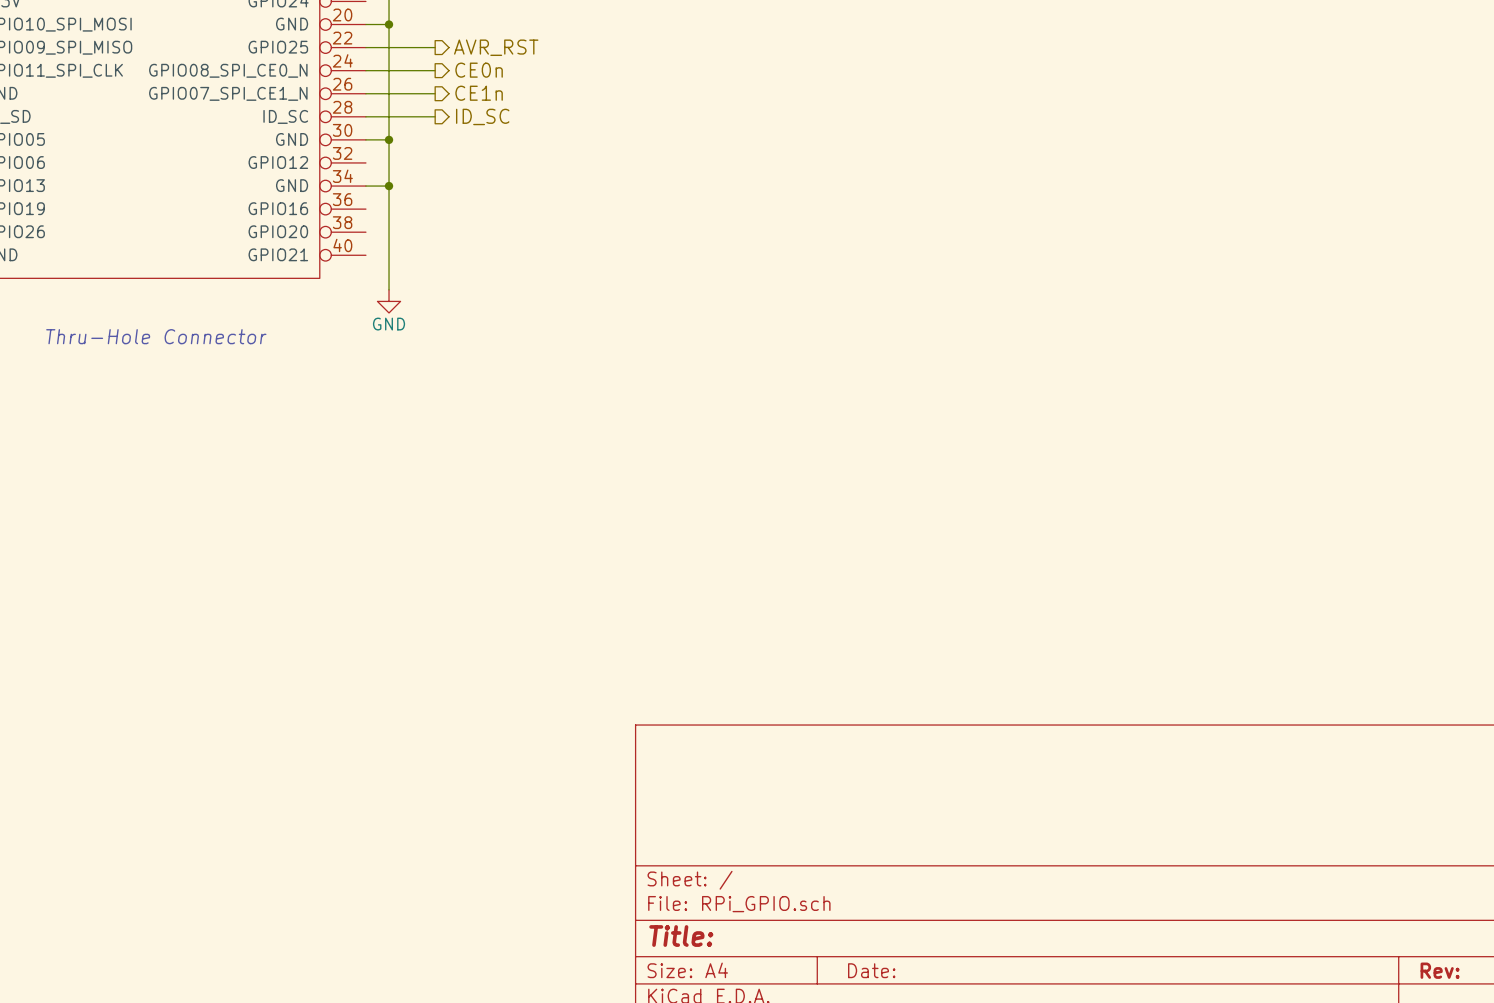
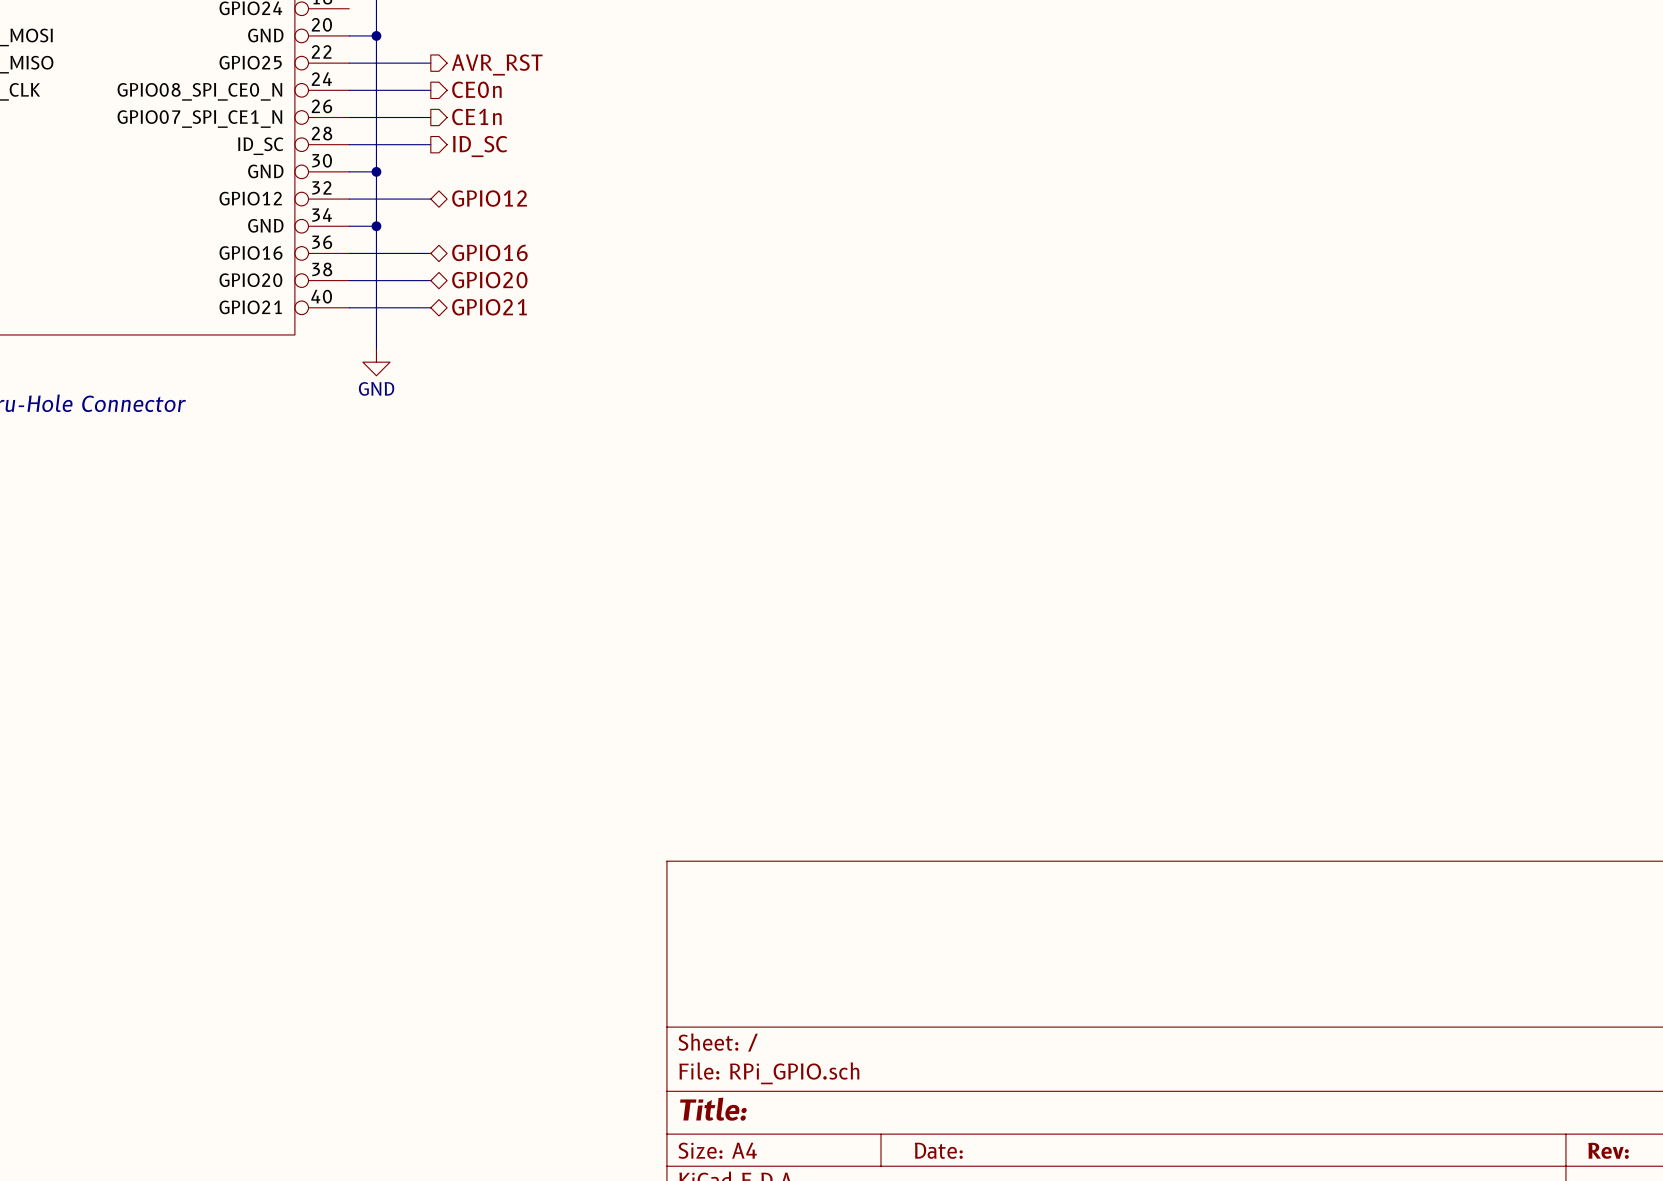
wire: none -> (349, 199) (430, 199)
hierarchical label: none -> GPIO12 (489, 198)
hierarchical label: none -> GPIO16 (489, 252)
wire: none -> (349, 253) (430, 253)
hierarchical label: none -> GPIO20 (489, 280)
wire: none -> (349, 280) (430, 280)
hierarchical label: none -> GPIO21 (489, 307)
wire: none -> (349, 307) (430, 307)

